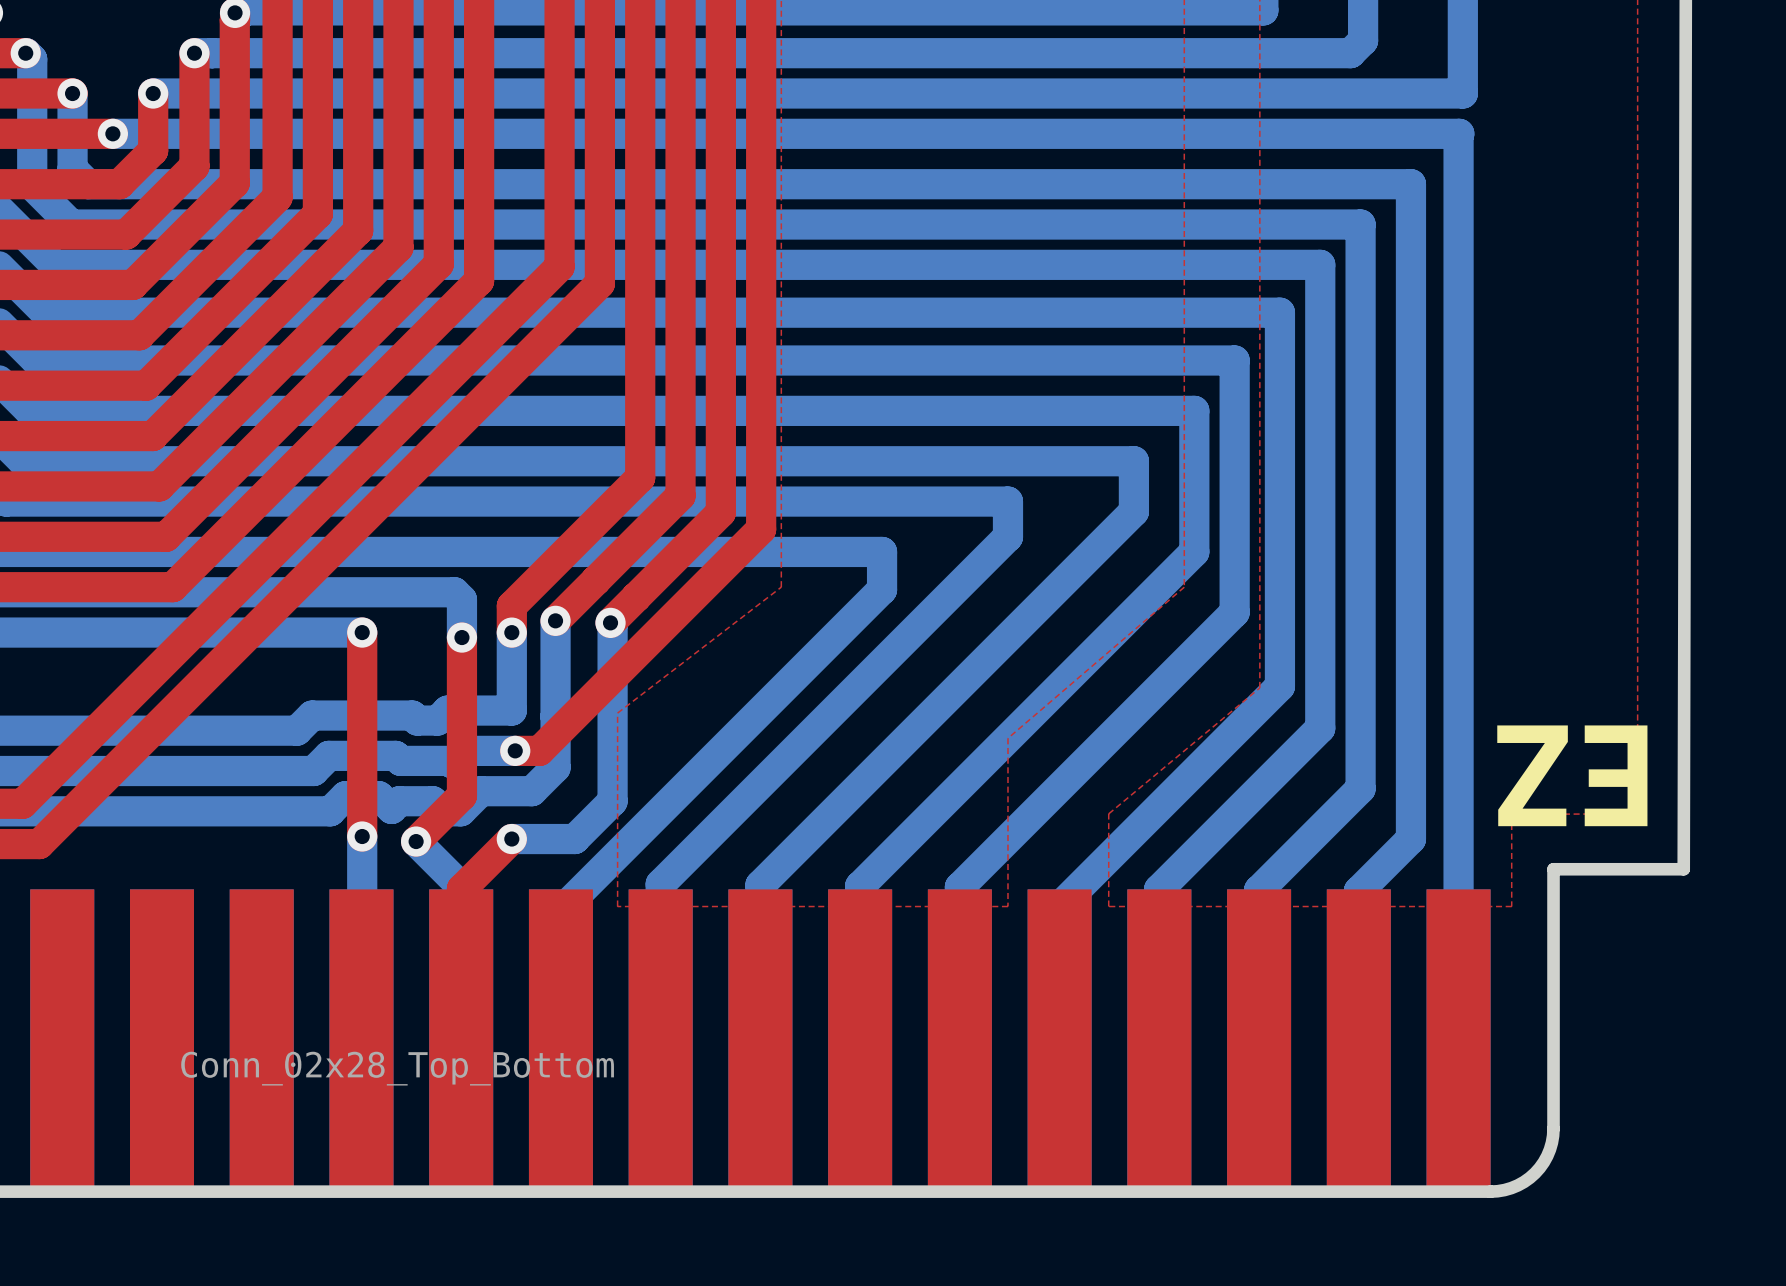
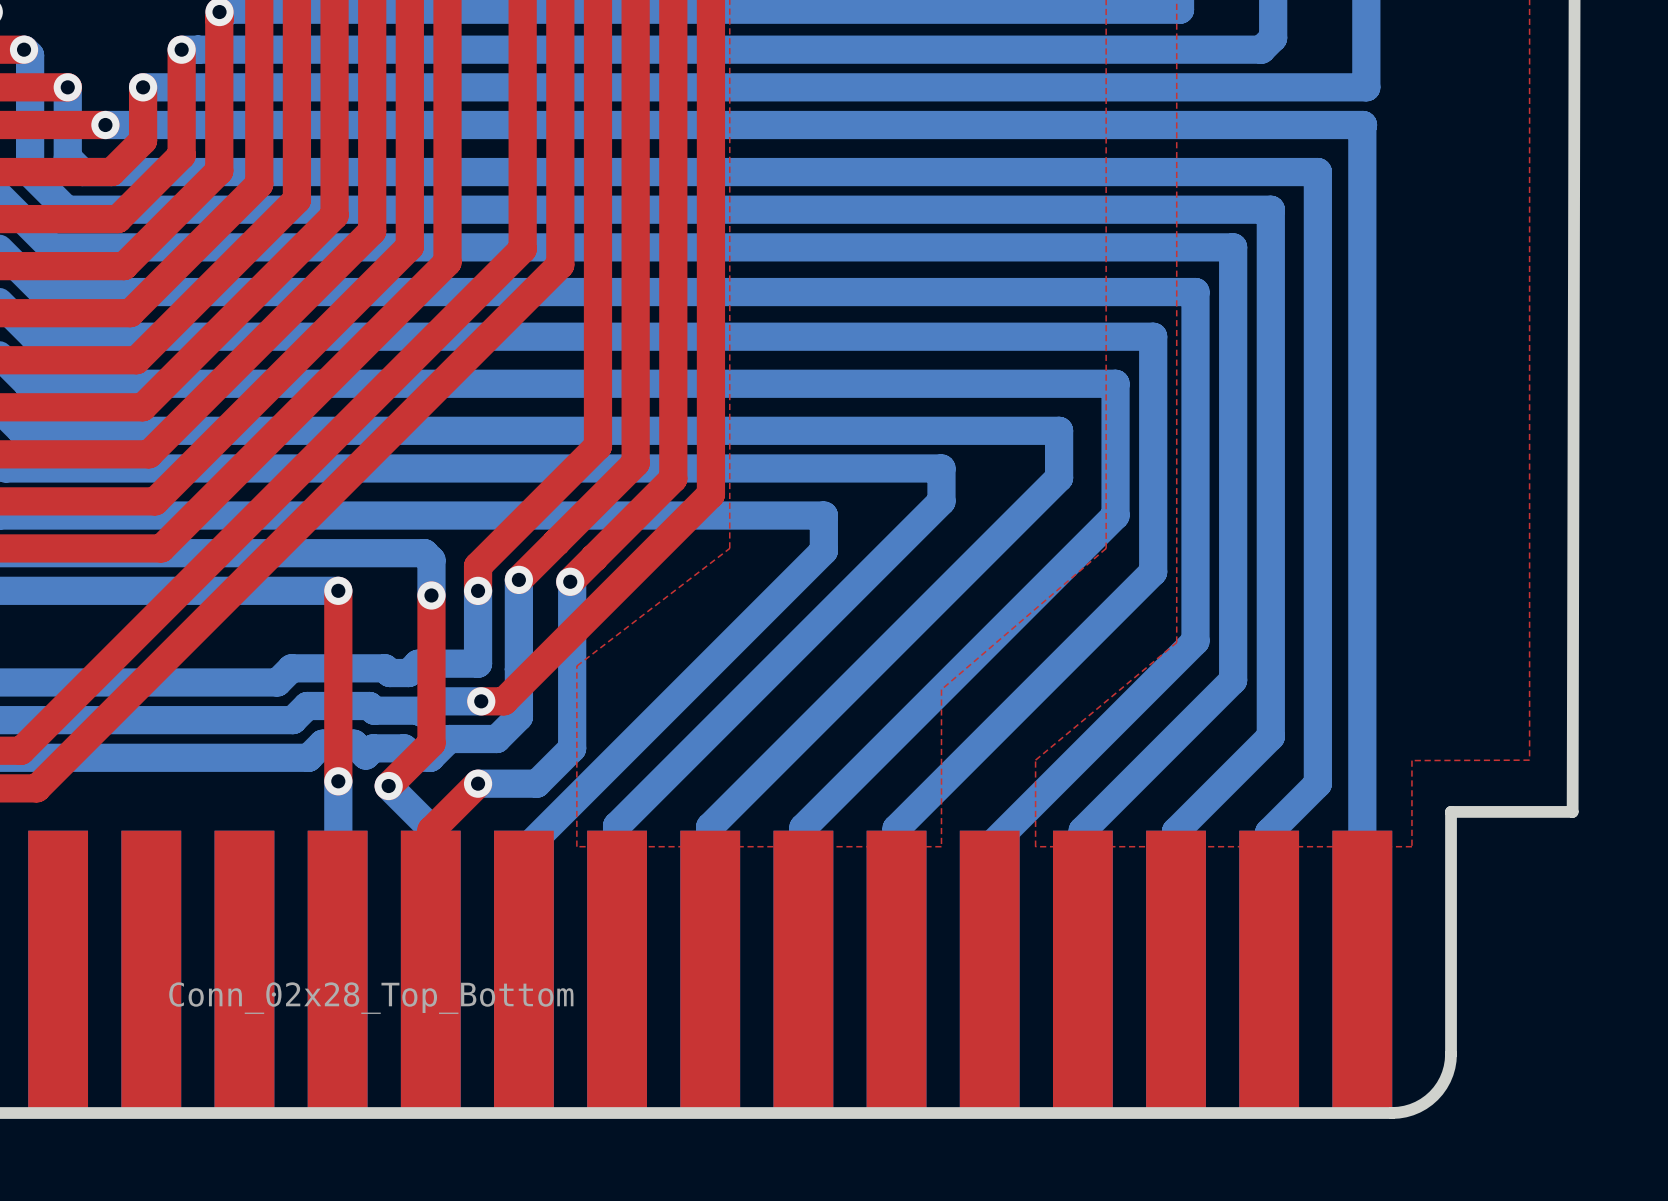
text: EZ (1572, 775) -> none

